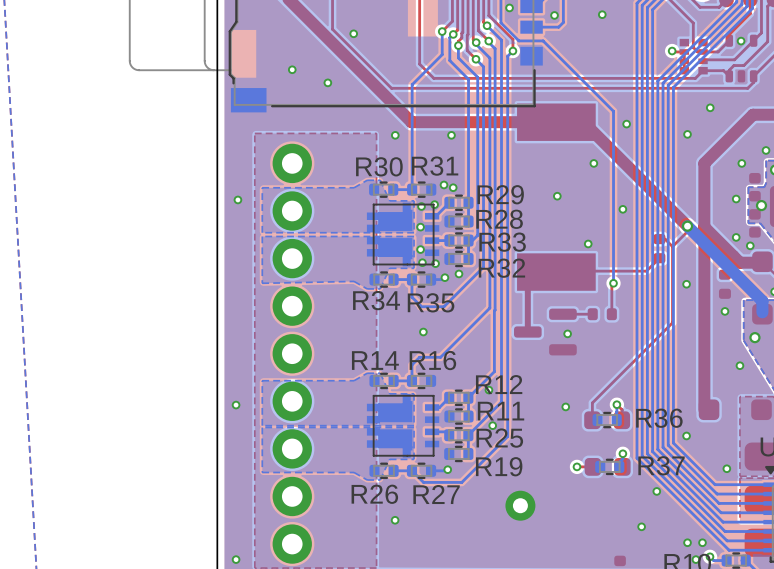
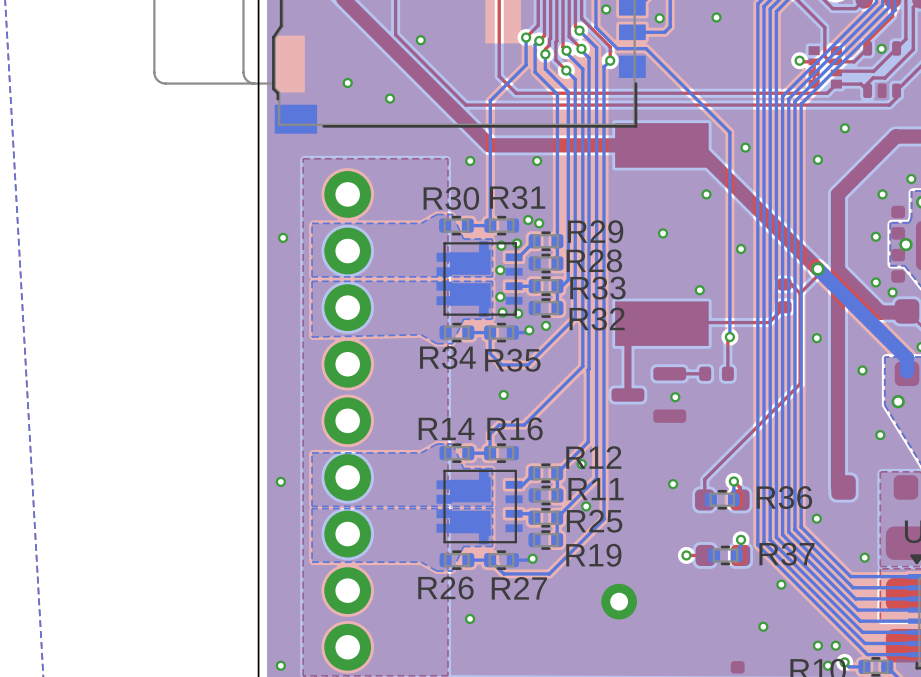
part: (724, 284) -> none

